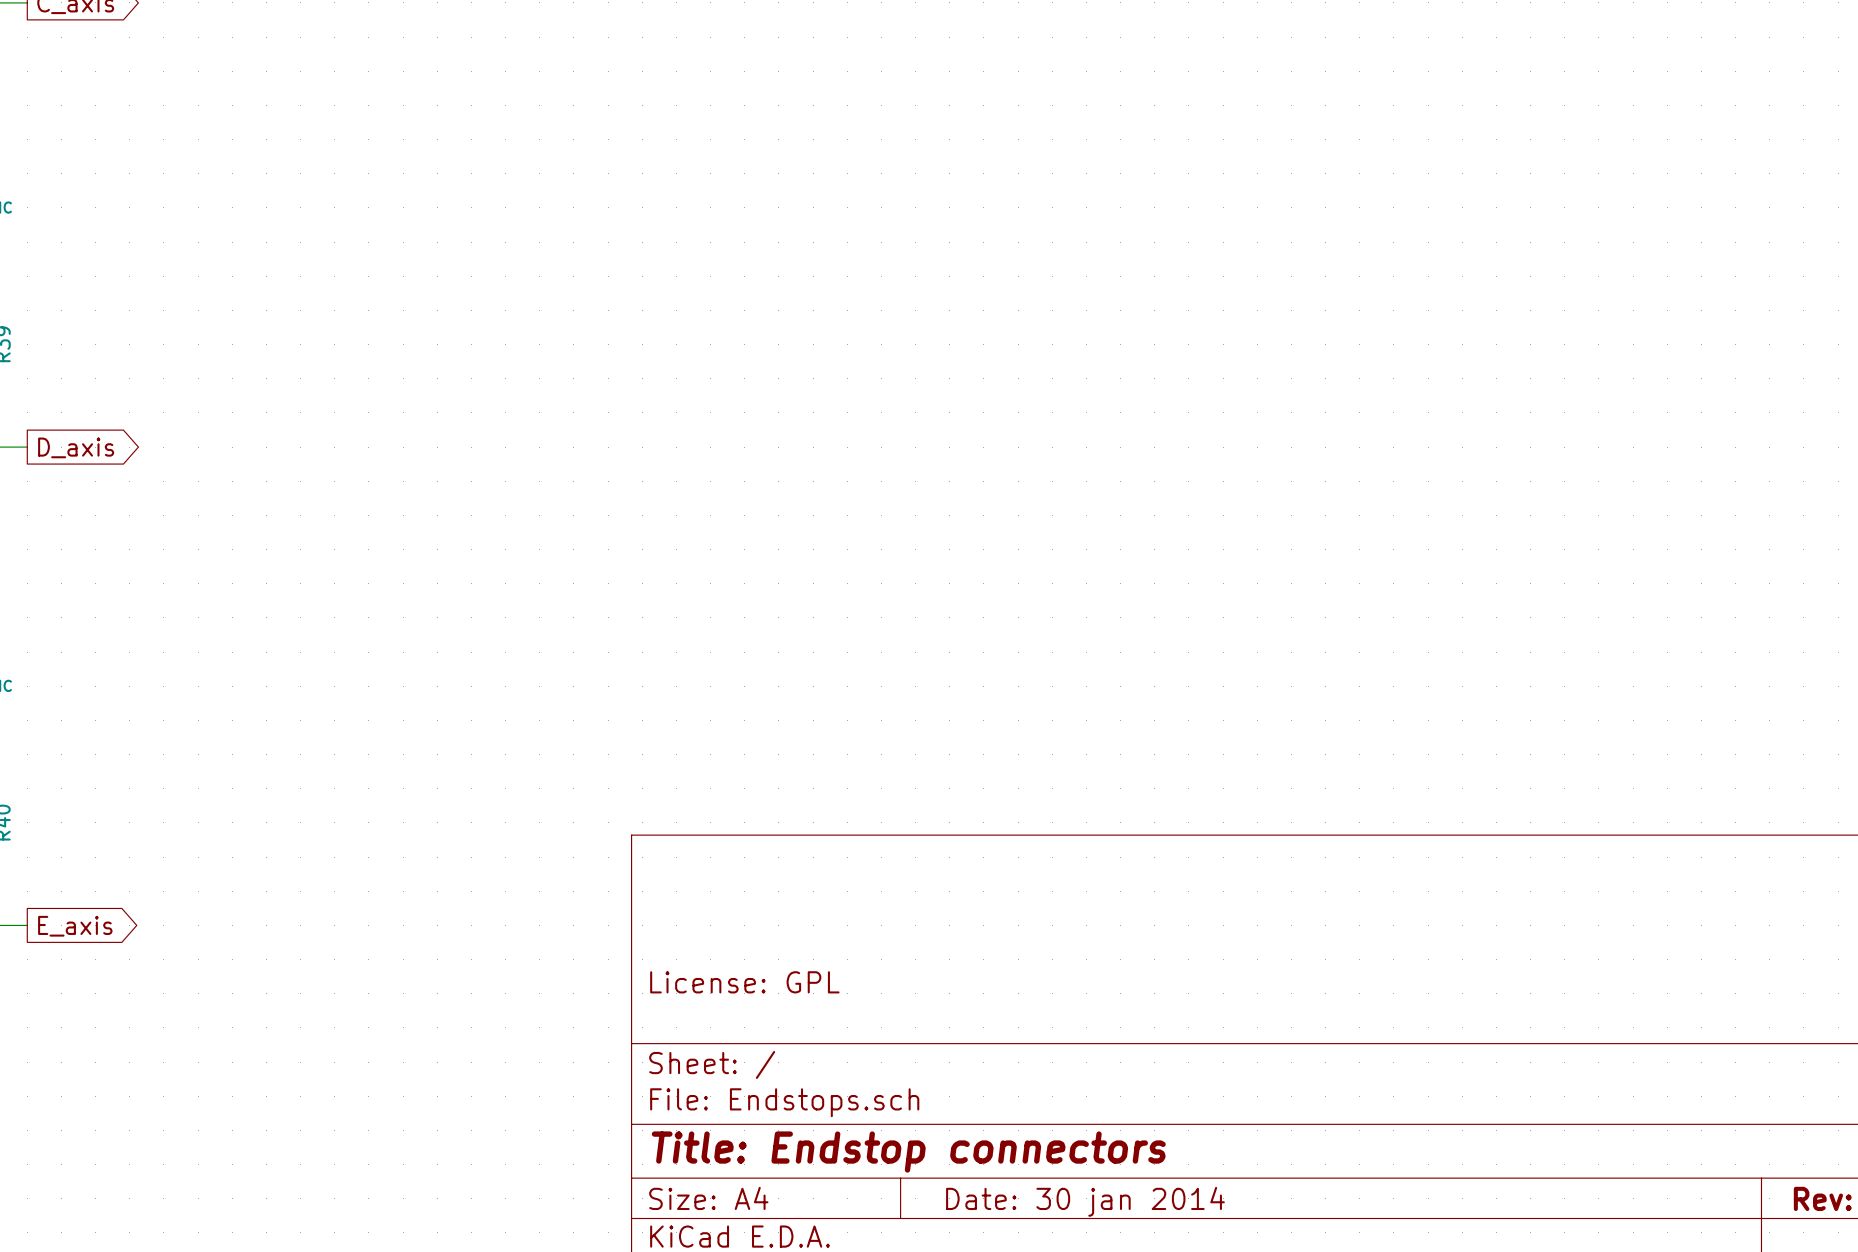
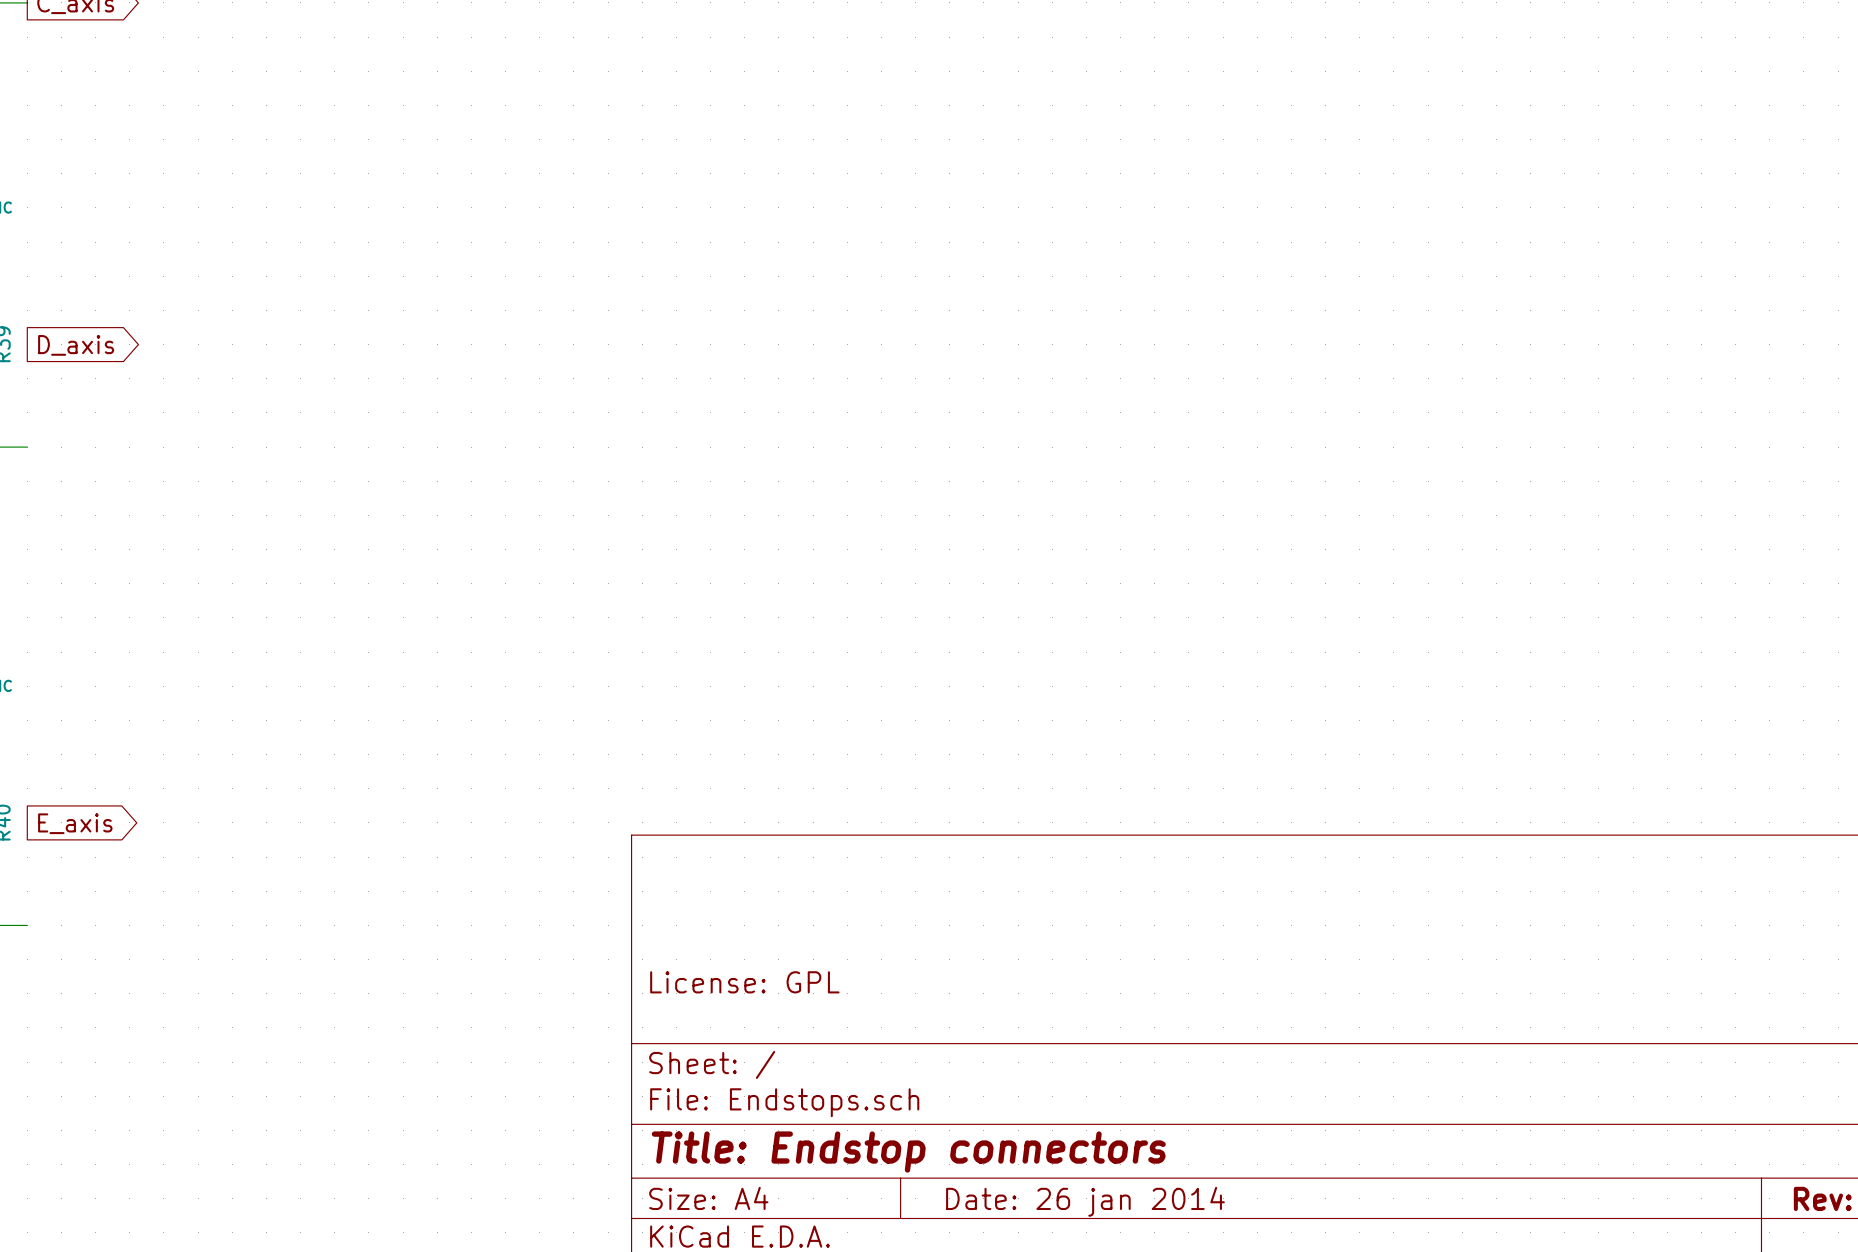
global label position: D_axis (76, 447) -> D_axis (76, 345)
global label position: E_axis (75, 926) -> E_axis (75, 823)
title block: Date: 30 jan 2014 (1085, 1201) -> Date: 26 jan 2014 (1085, 1201)

